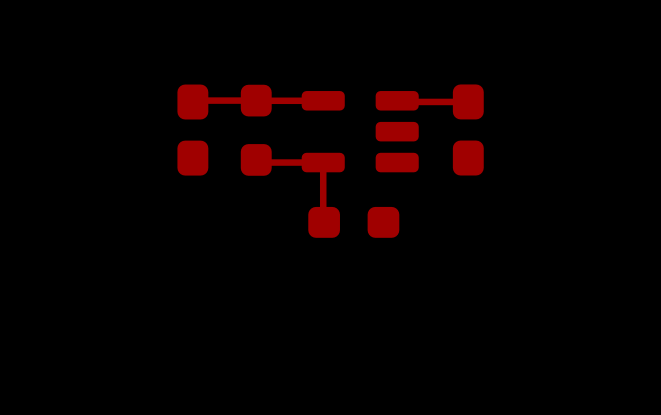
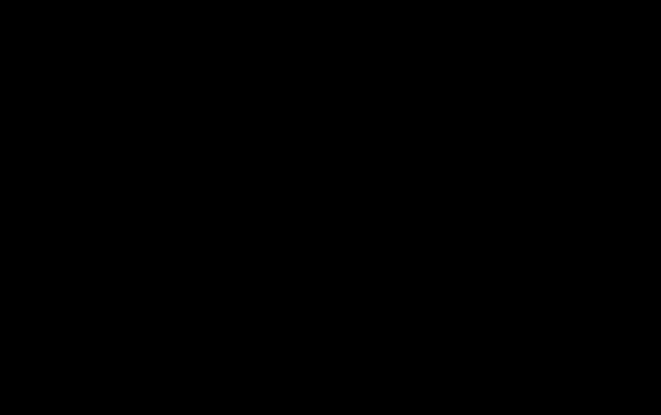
top track: (397, 100) (468, 101) -> none
part: (468, 129) -> none
part: (192, 130) -> none
part: (256, 130) -> none
part: (360, 131) -> none
top track: (259, 162) (323, 162) (324, 222) -> none
part: (353, 222) -> none

